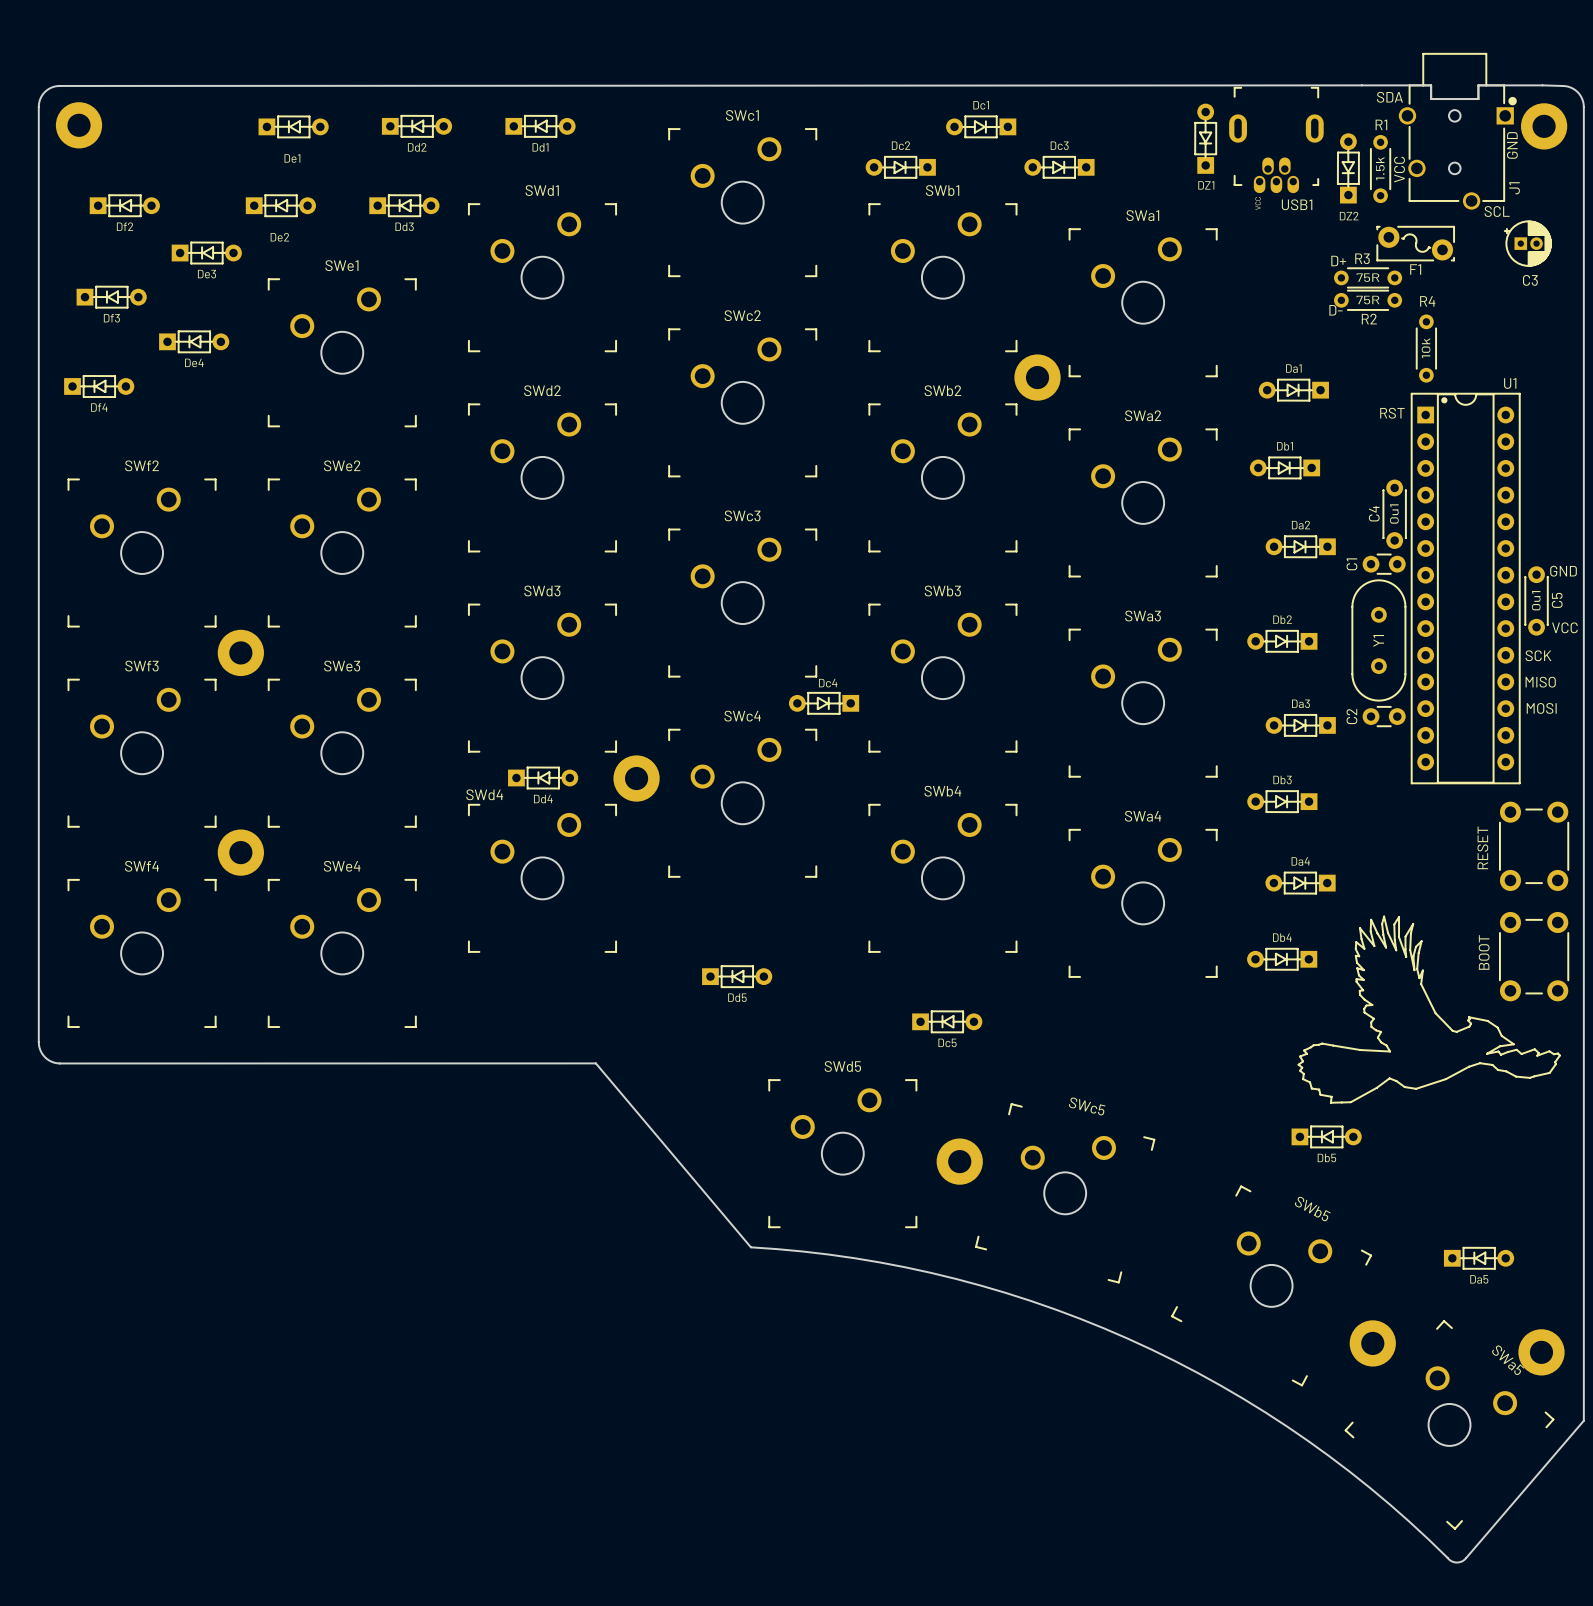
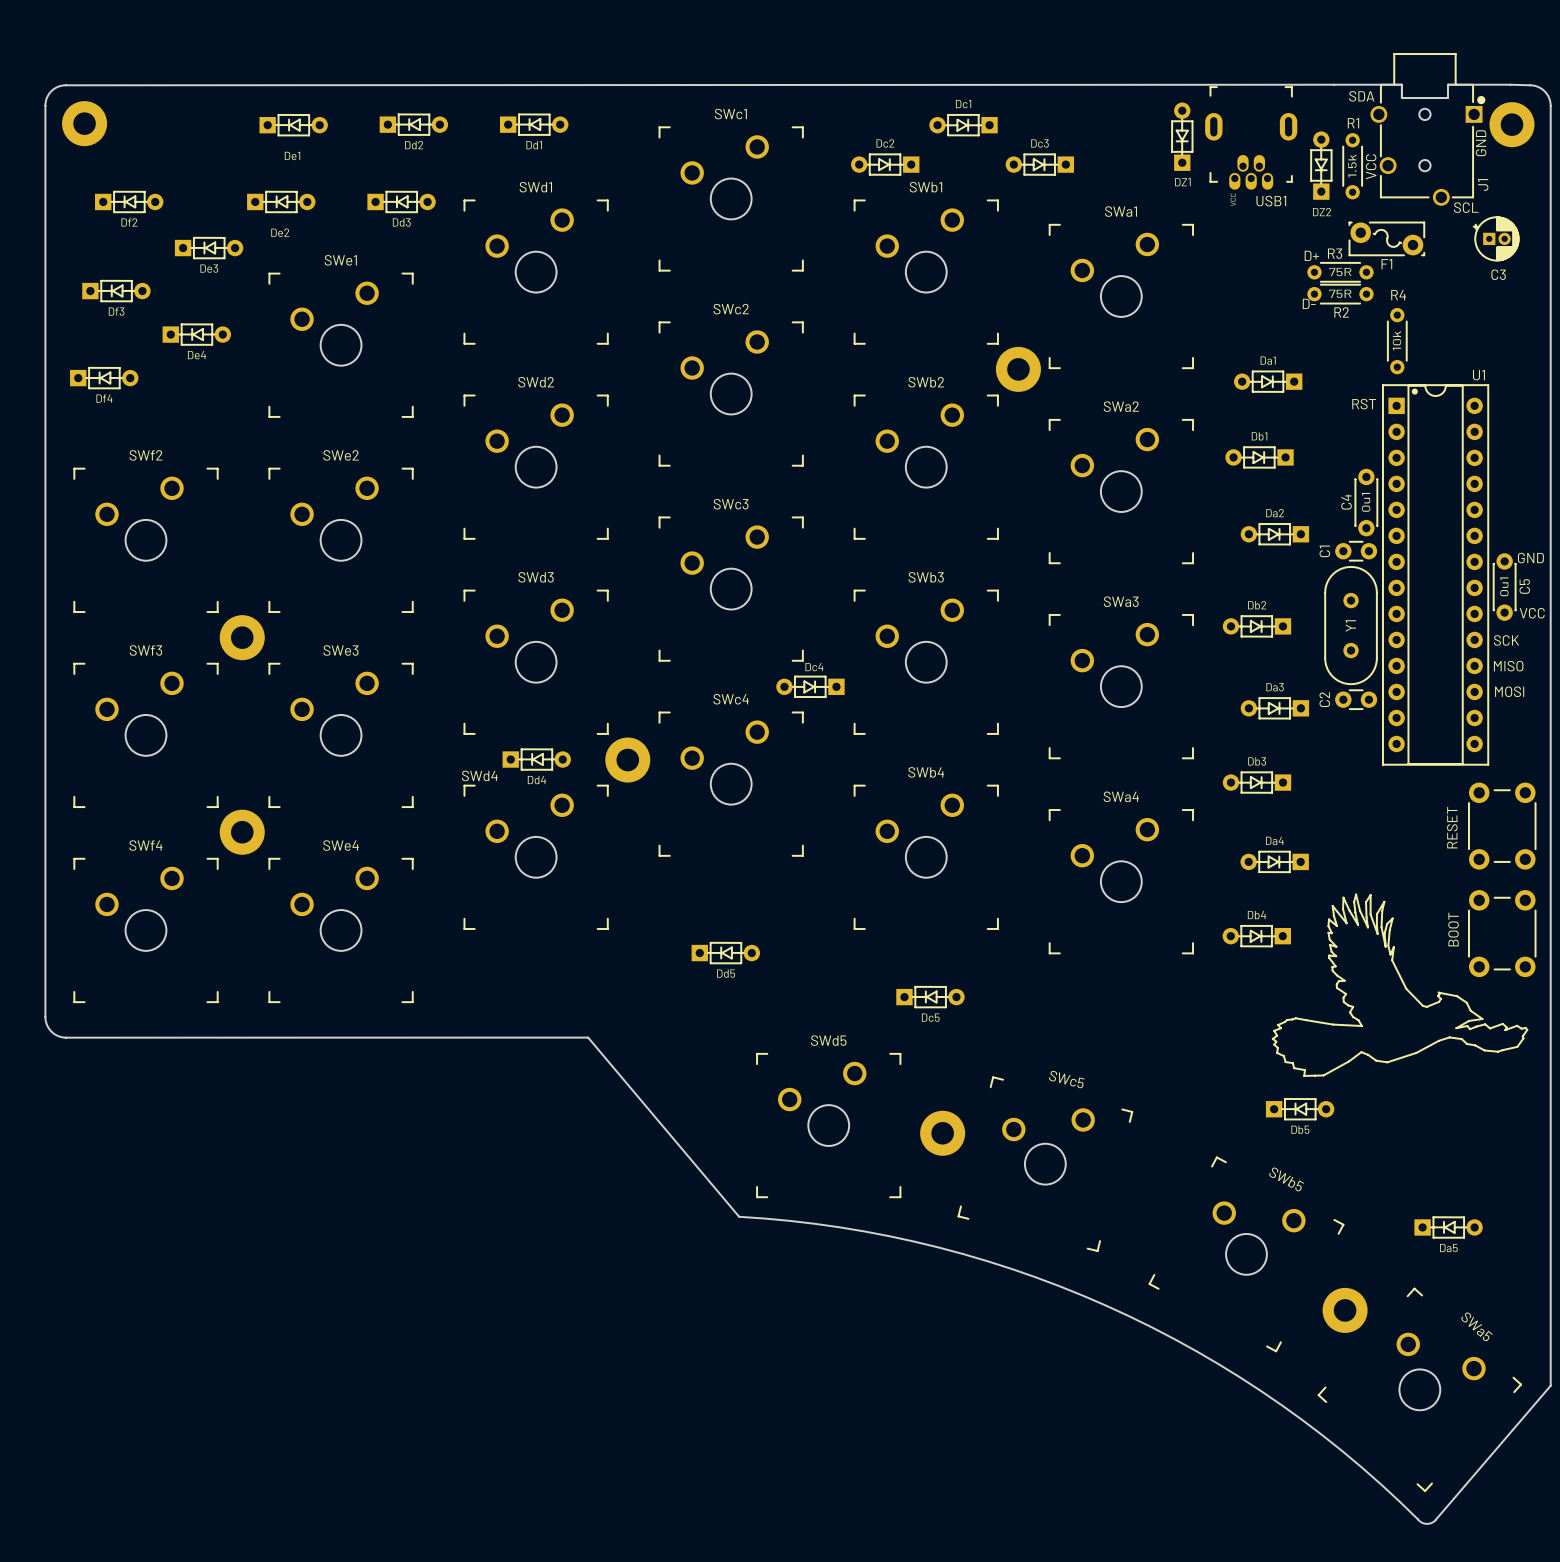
part: (1541, 1352) -> none

